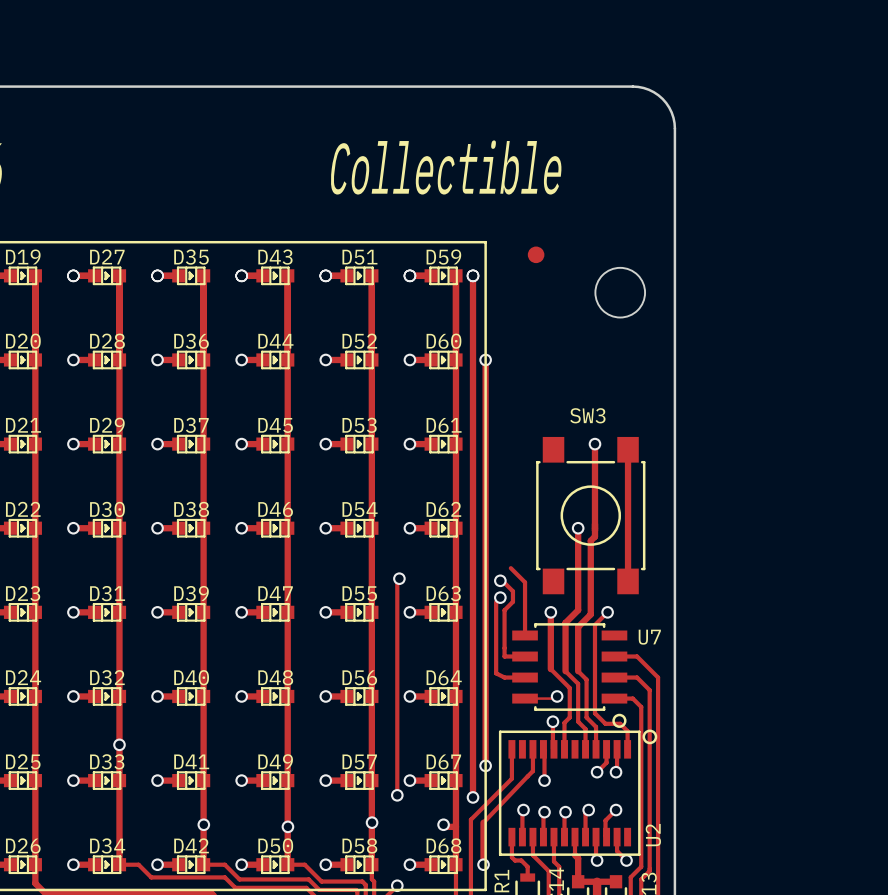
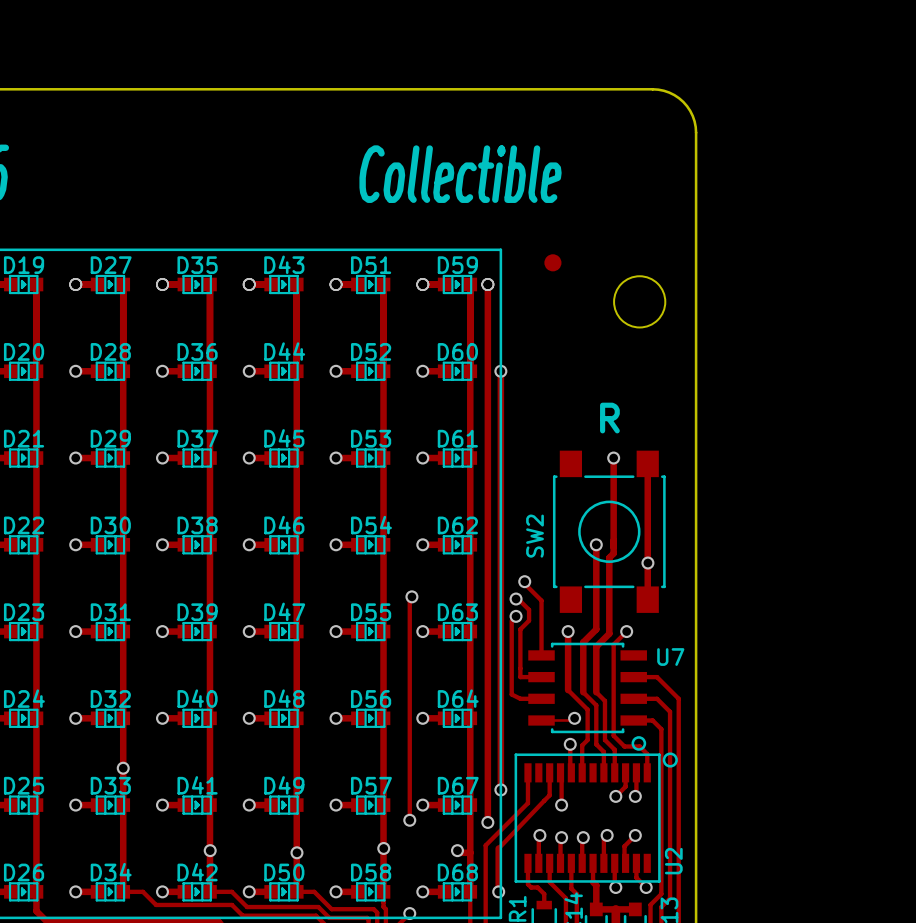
text: none -> R (609, 418)
SW3 name: SW3 (587, 415) -> SW2 (535, 536)
via: none -> (647, 563)
via: none -> (524, 581)

